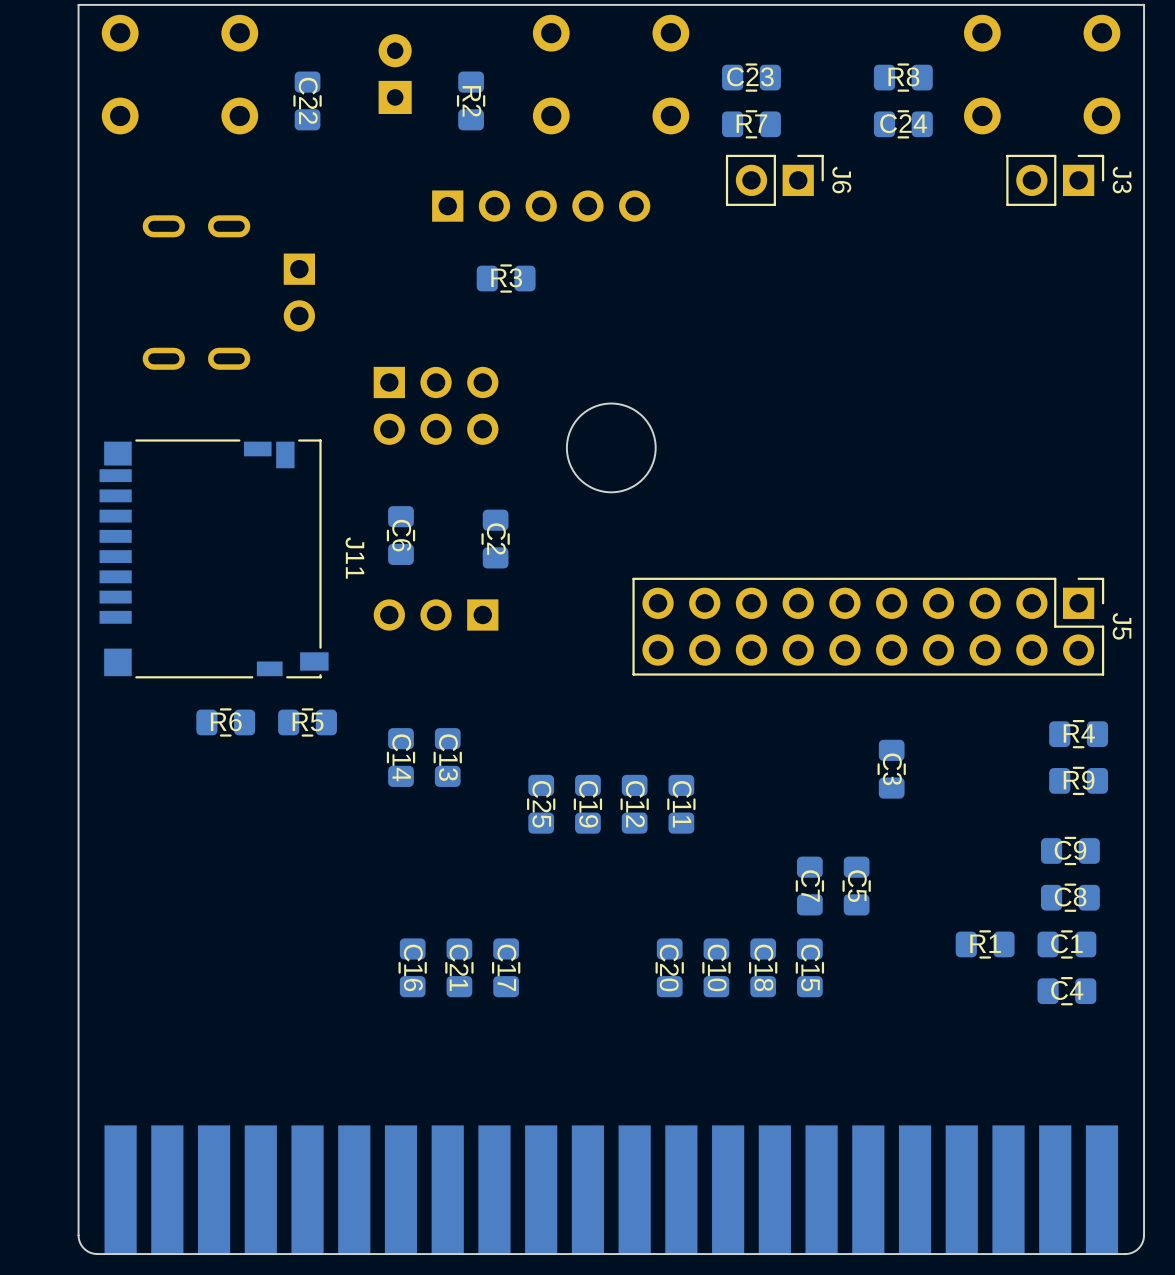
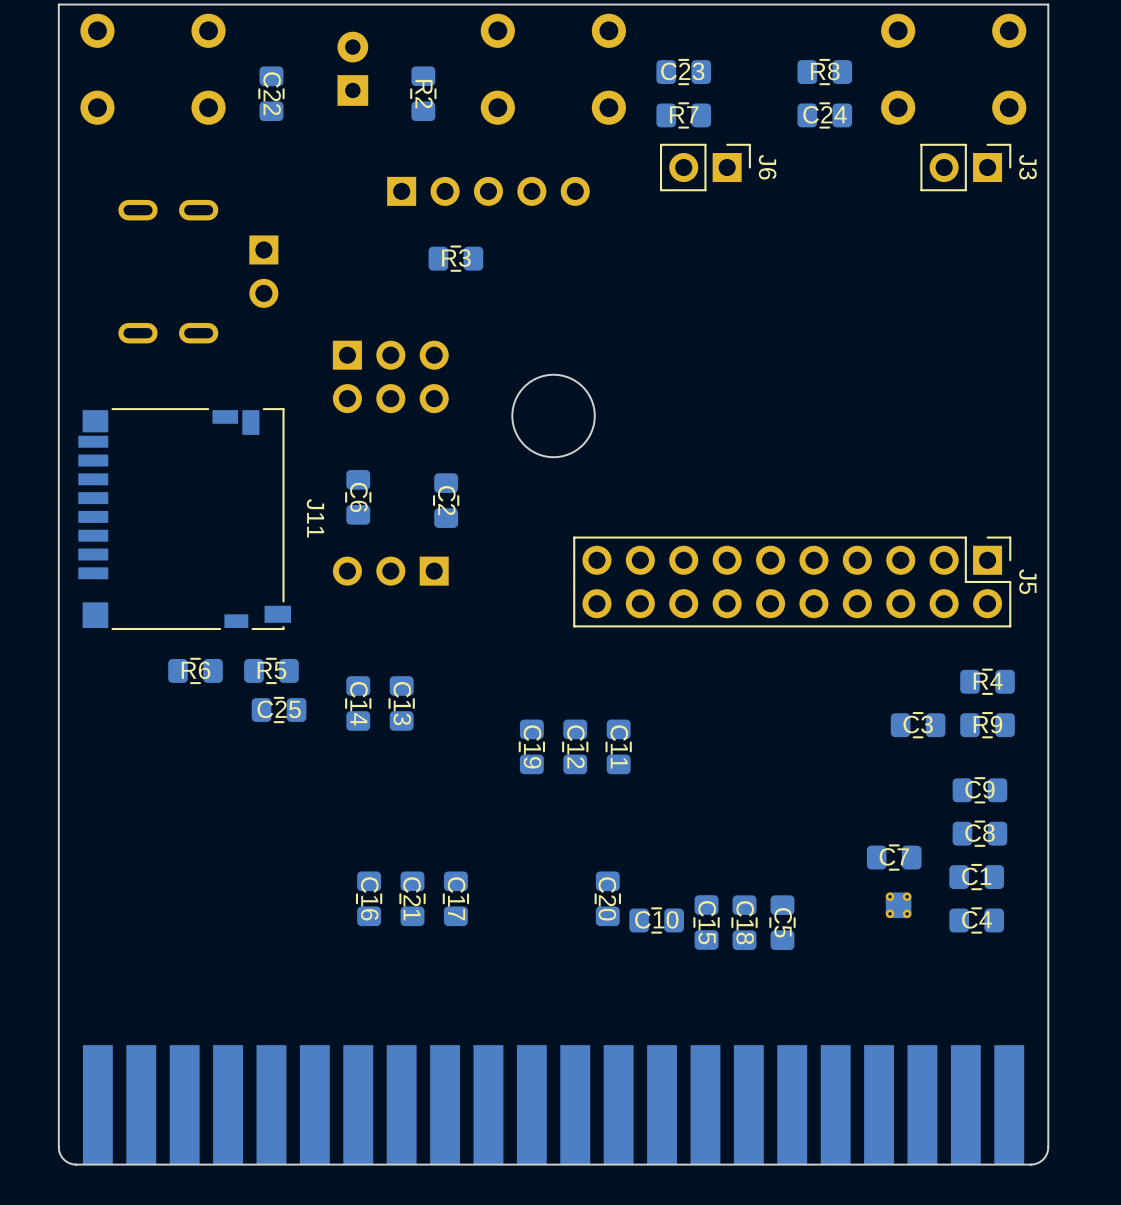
C3 rotation: 0° (891, 769) -> 90° clockwise (918, 725)
C3 position: (891, 769) -> (918, 725)
C25 rotation: 0° (541, 804) -> 90° clockwise (279, 710)
C25 position: (541, 804) -> (279, 710)
C7 rotation: 0° (809, 886) -> 90° clockwise (894, 857)
C7 position: (809, 886) -> (894, 857)
C5 position: (856, 886) -> (782, 922)
R1: (985, 944) -> none
C10 rotation: 0° (716, 967) -> 90° clockwise (656, 920)
C18 position: (763, 967) -> (744, 922)
C15 position: (809, 967) -> (706, 922)
part: none -> (898, 905)

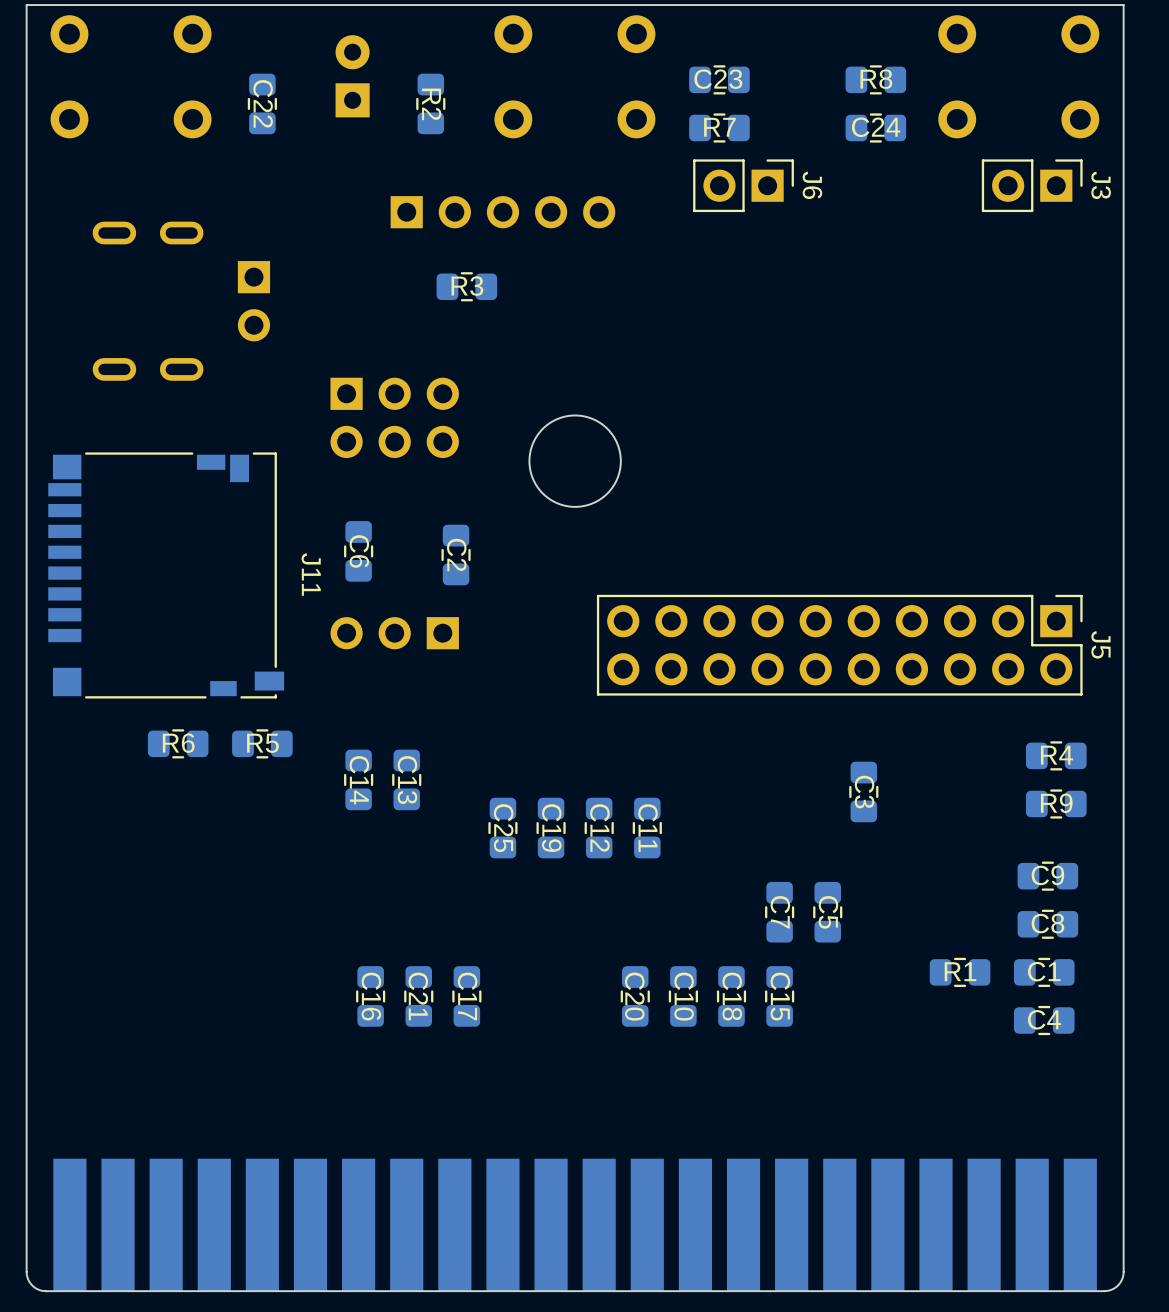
C25 rotation: 0° (279, 710) -> 90° clockwise (502, 828)
C25 position: (279, 710) -> (502, 828)
C3 rotation: 0° (918, 725) -> 90° clockwise (863, 791)
C3 position: (918, 725) -> (863, 791)
C7 rotation: 0° (894, 857) -> 90° clockwise (779, 912)
C7 position: (894, 857) -> (779, 912)
R1: none -> (960, 972)
part: (898, 905) -> none
C10 rotation: 0° (656, 920) -> 90° clockwise (683, 996)
C15 position: (706, 922) -> (779, 996)
C18 position: (744, 922) -> (731, 996)
C5 position: (782, 922) -> (827, 912)

